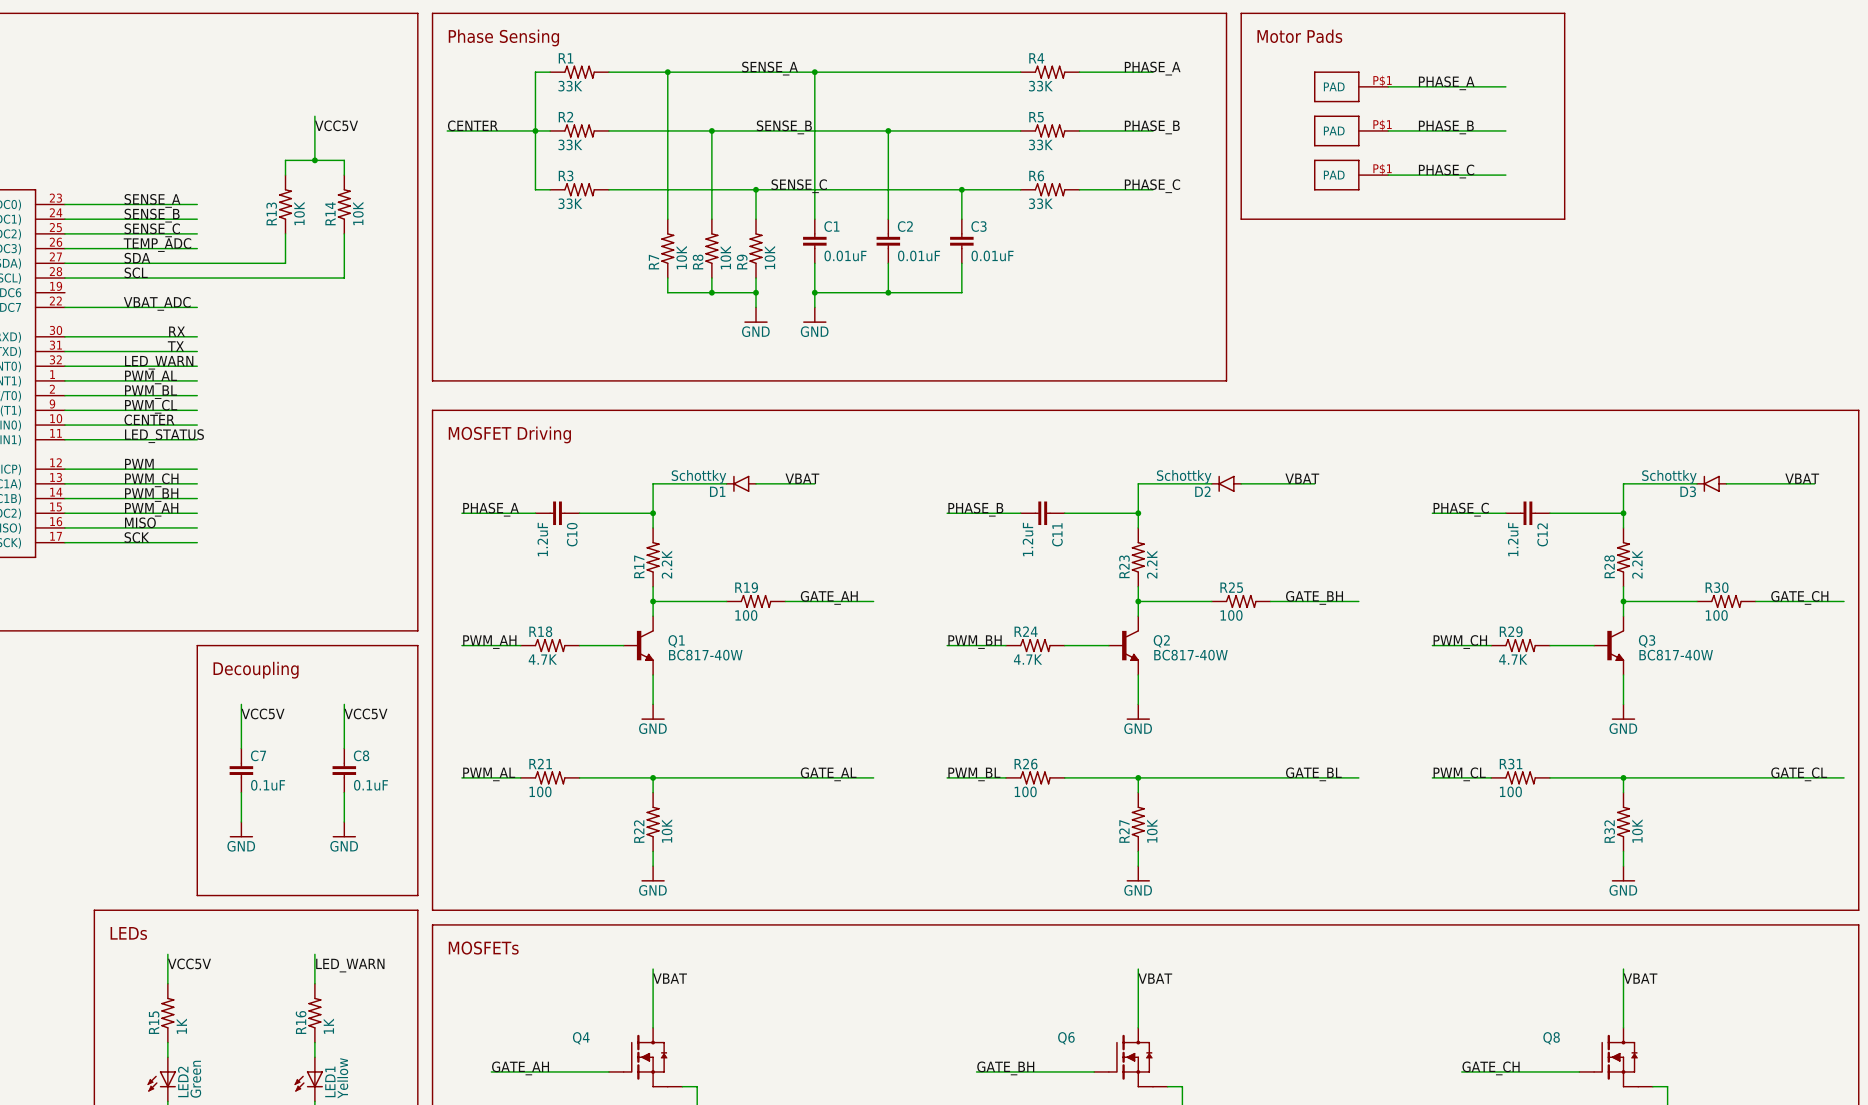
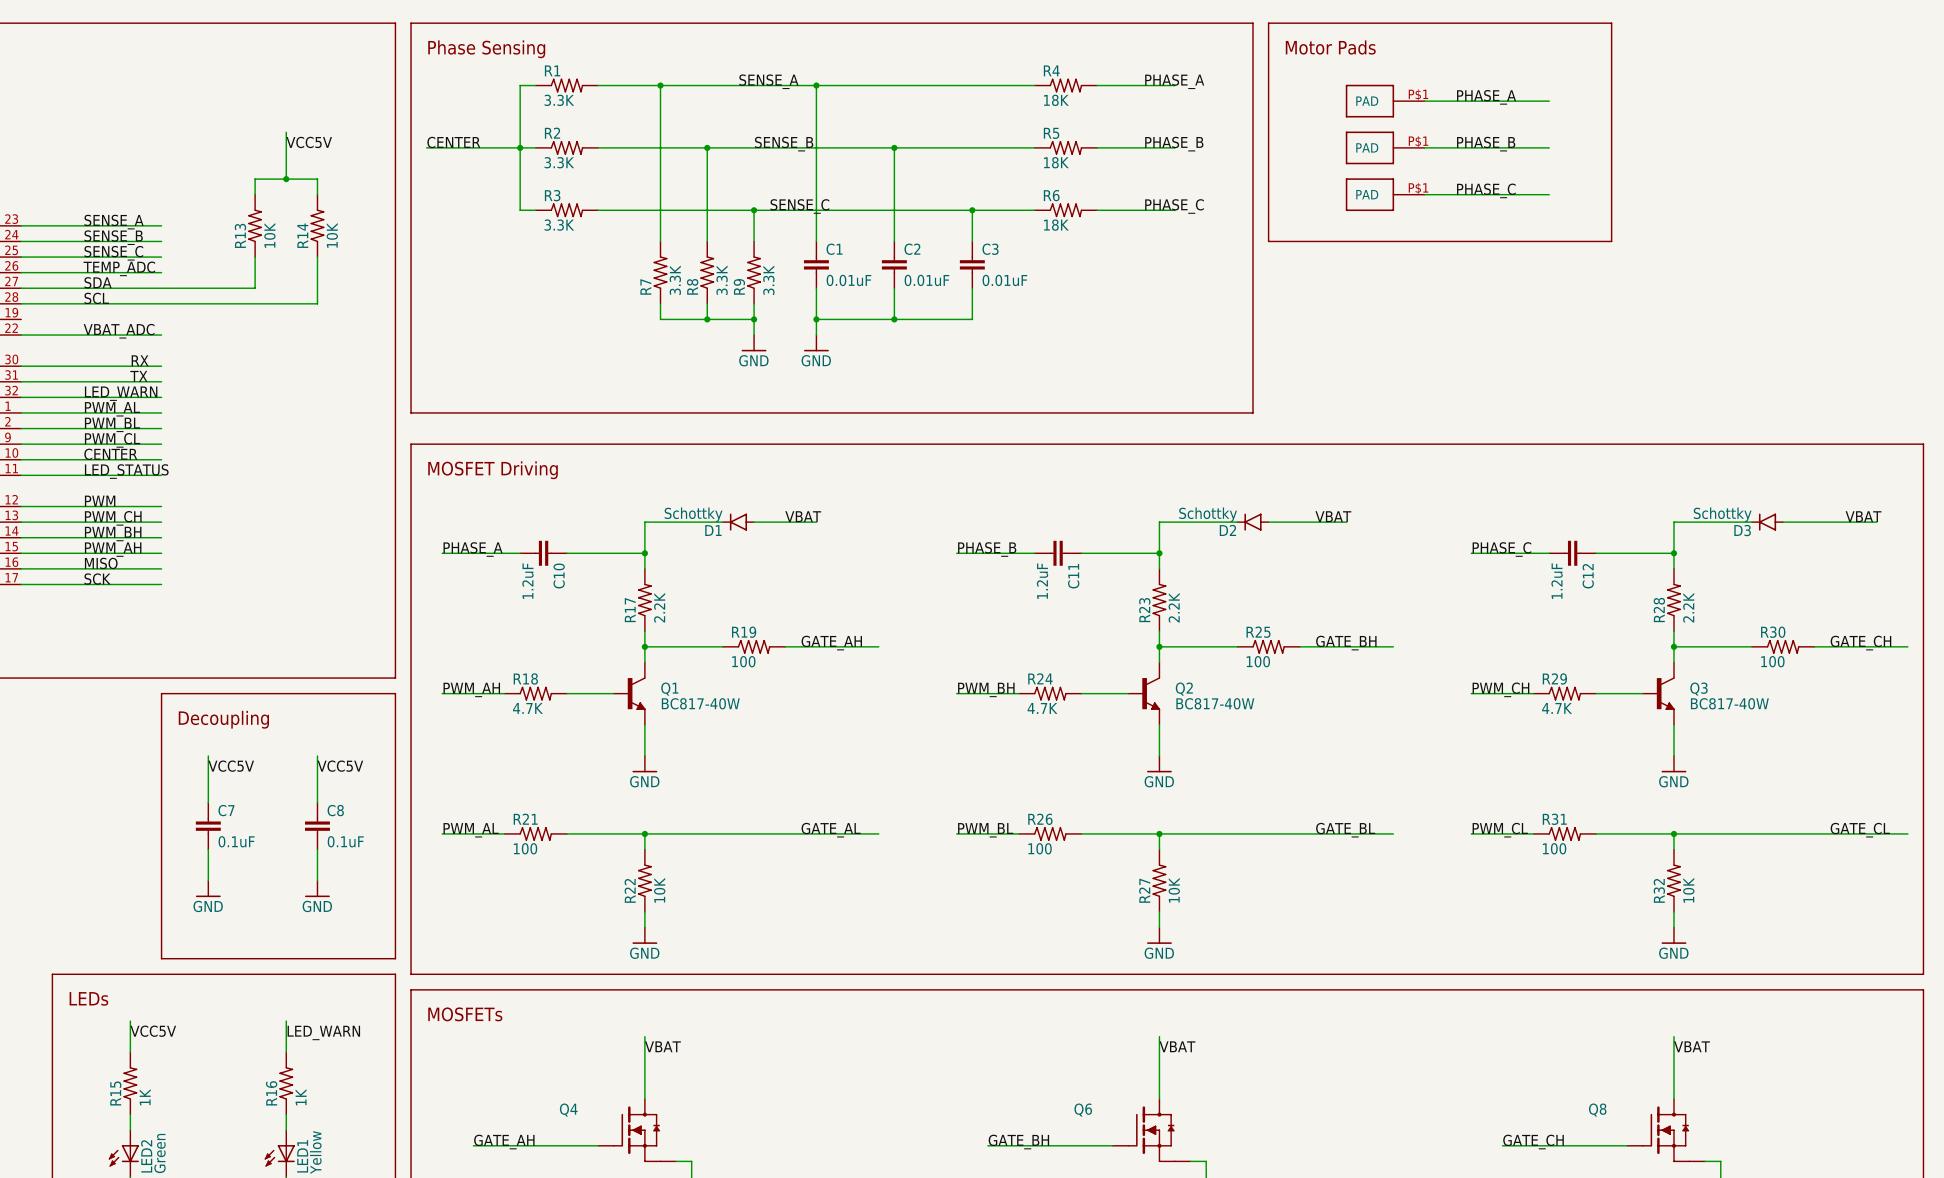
R1 value: 33K (570, 86) -> 3.3K (559, 100)
R4 value: 33K (1040, 86) -> 18K (1056, 100)
R2 value: 33K (570, 144) -> 3.3K (559, 162)
R5 value: 33K (1040, 144) -> 18K (1056, 162)
R3 value: 33K (570, 203) -> 3.3K (559, 225)
R6 value: 33K (1040, 203) -> 18K (1056, 225)
R7 value: 10K (681, 257) -> 3.3K (675, 280)
R8 value: 10K (725, 257) -> 3.3K (722, 280)
R9 value: 10K (769, 257) -> 3.3K (768, 280)

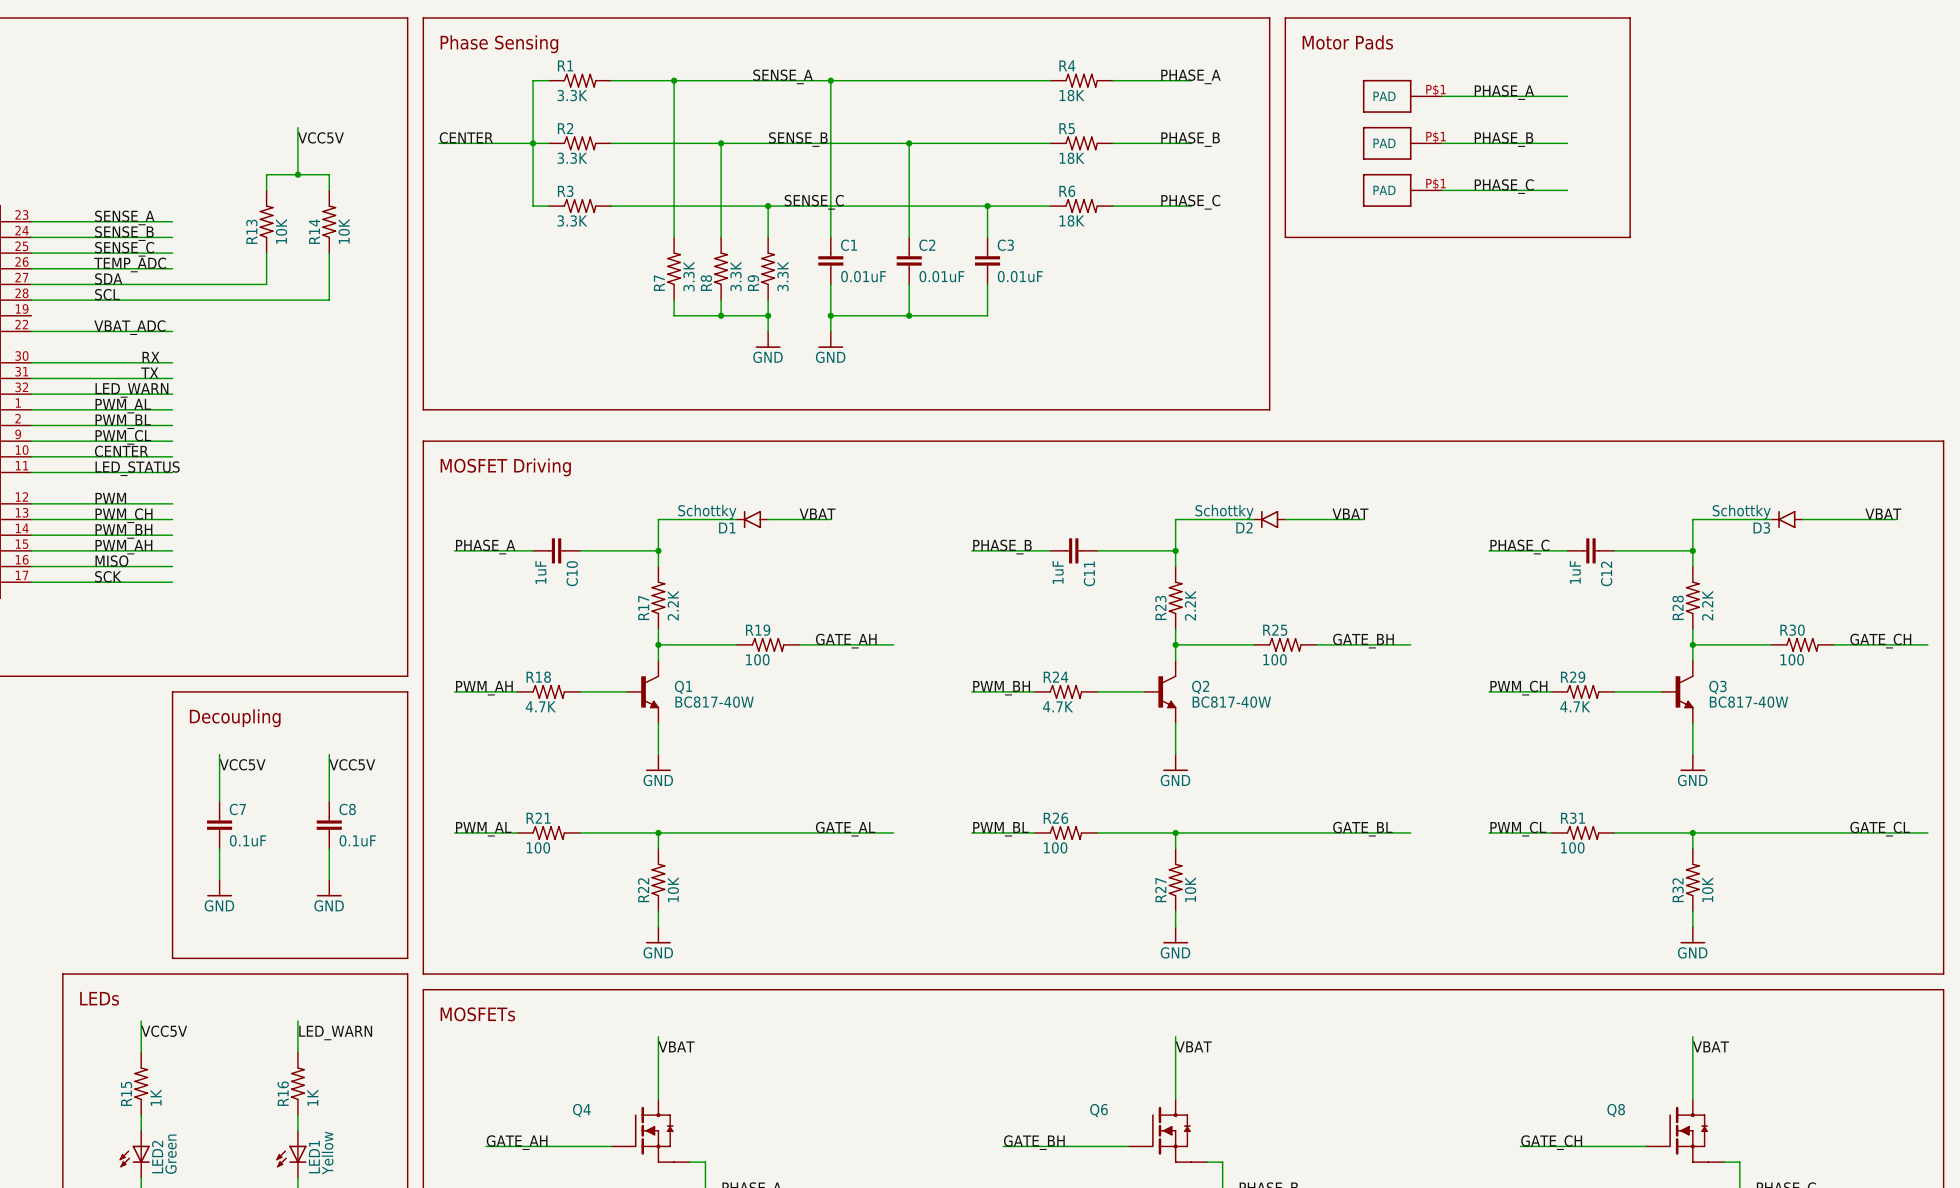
C10 value: 1.2uF (527, 581) -> 1uF (540, 572)
C11 value: 1.2uF (1042, 581) -> 1uF (1058, 572)
C12 value: 1.2uF (1557, 581) -> 1uF (1575, 572)

